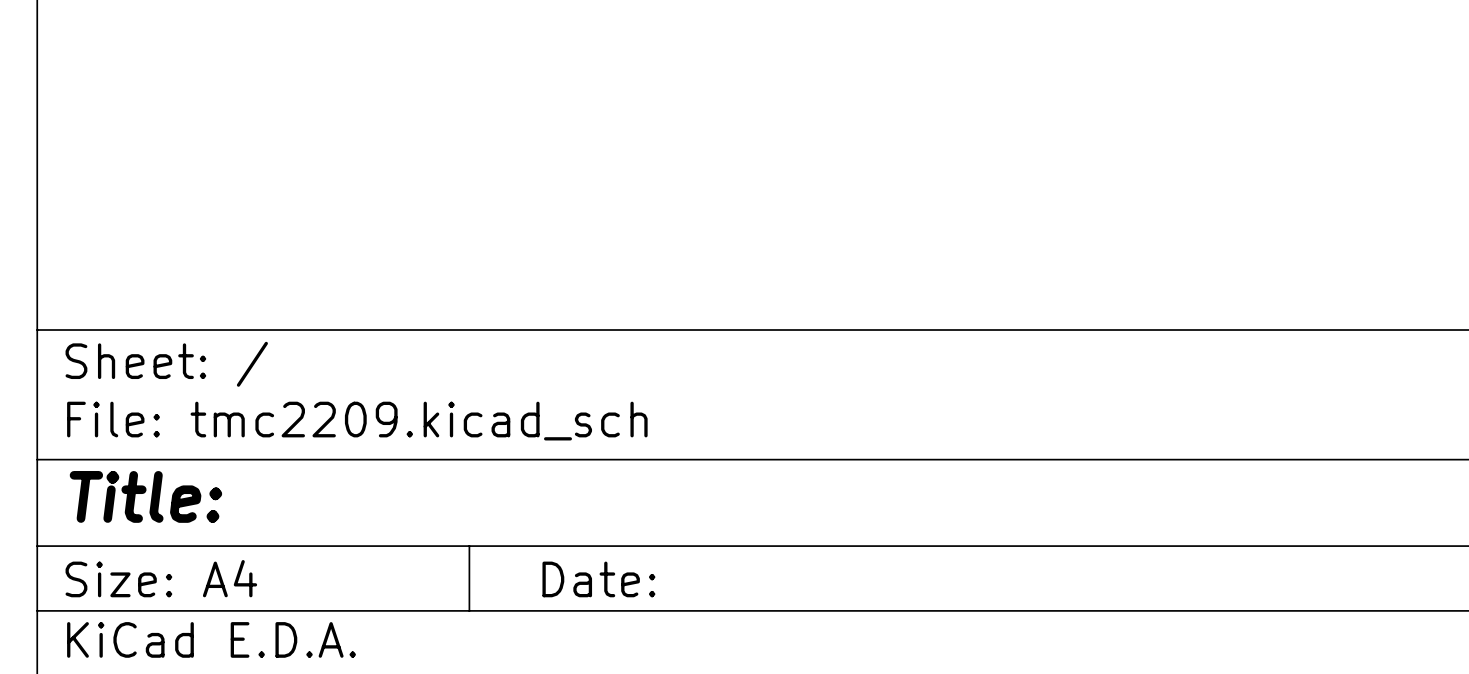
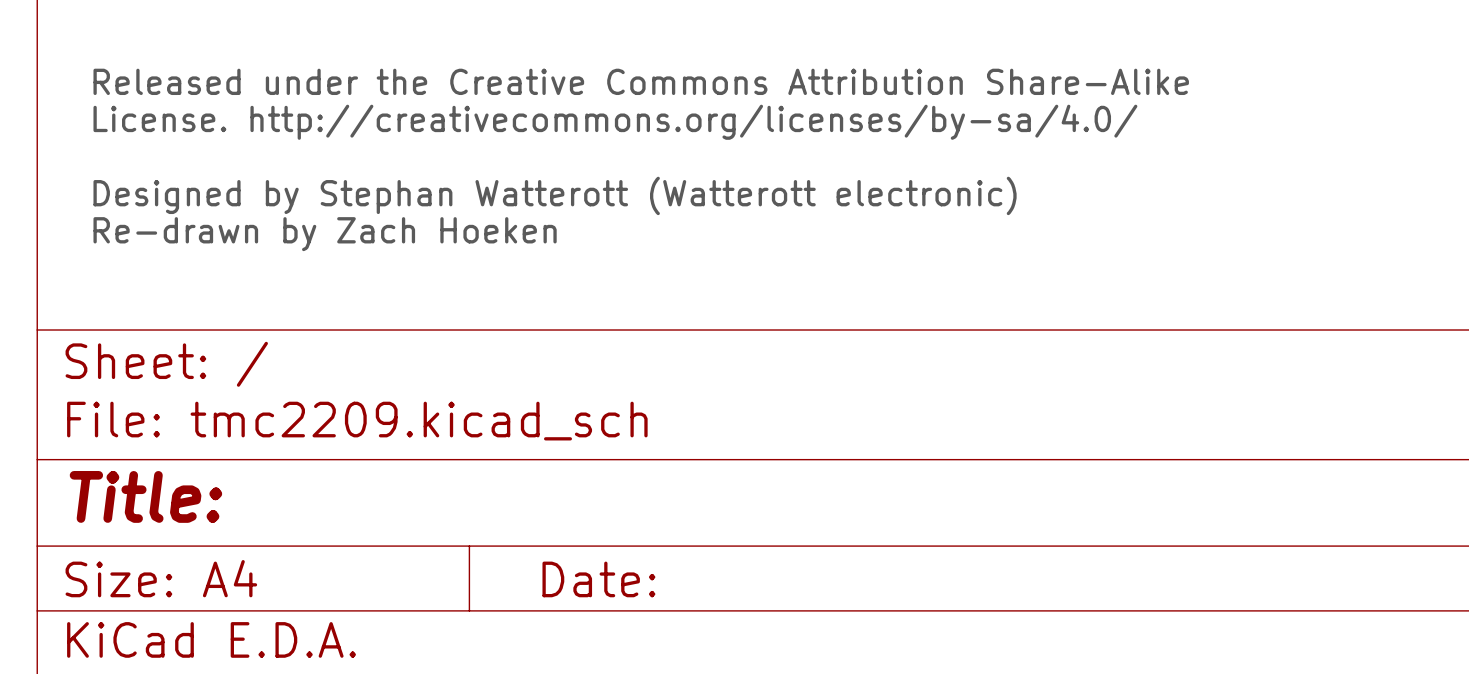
text: none -> Released under the Creative Commons Attribution Share-Alike (641, 81)
text: none -> License. http://creativecommons.org/licenses/by-sa/4.0/ (615, 122)
text: none -> Designed by Stephan Watterott (Watterott electronic) (555, 195)
text: none -> Re-drawn by Zach Hoeken (325, 234)

